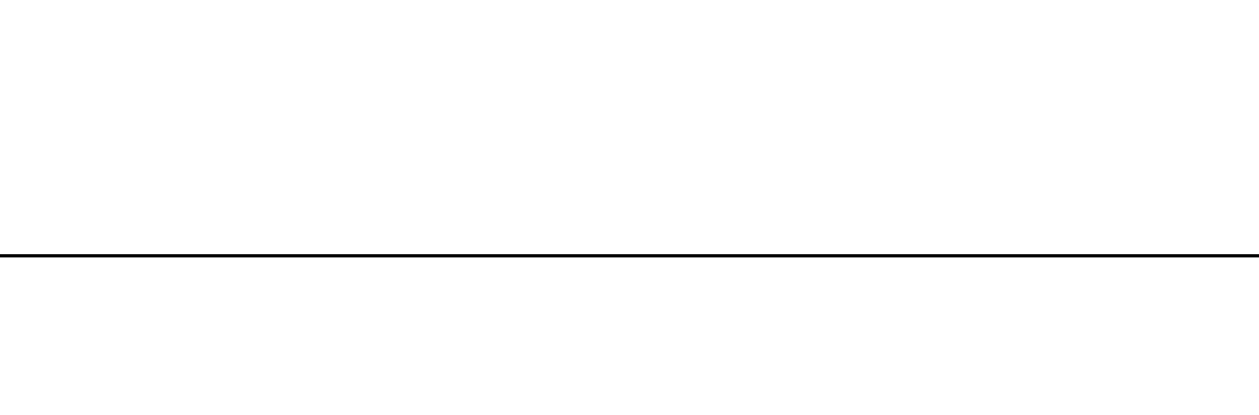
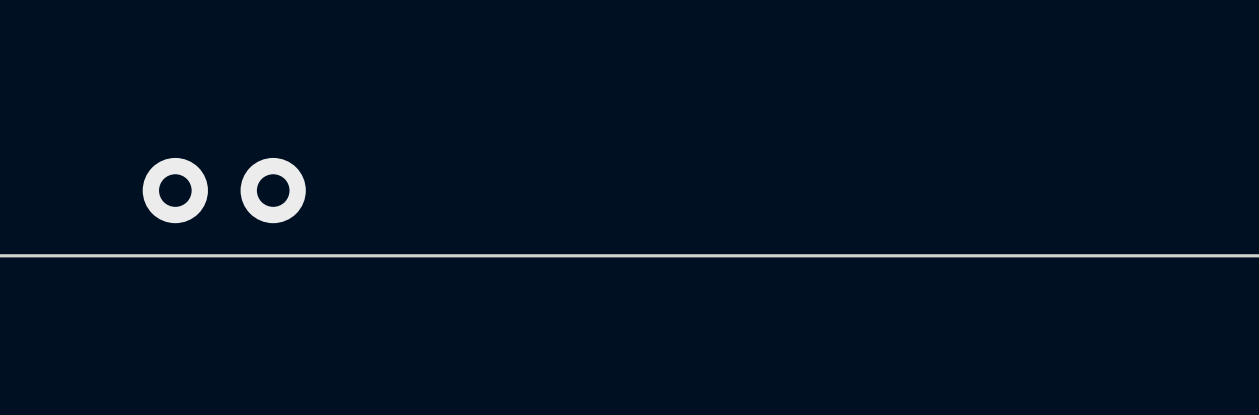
via: none -> (175, 190)
via: none -> (273, 190)

